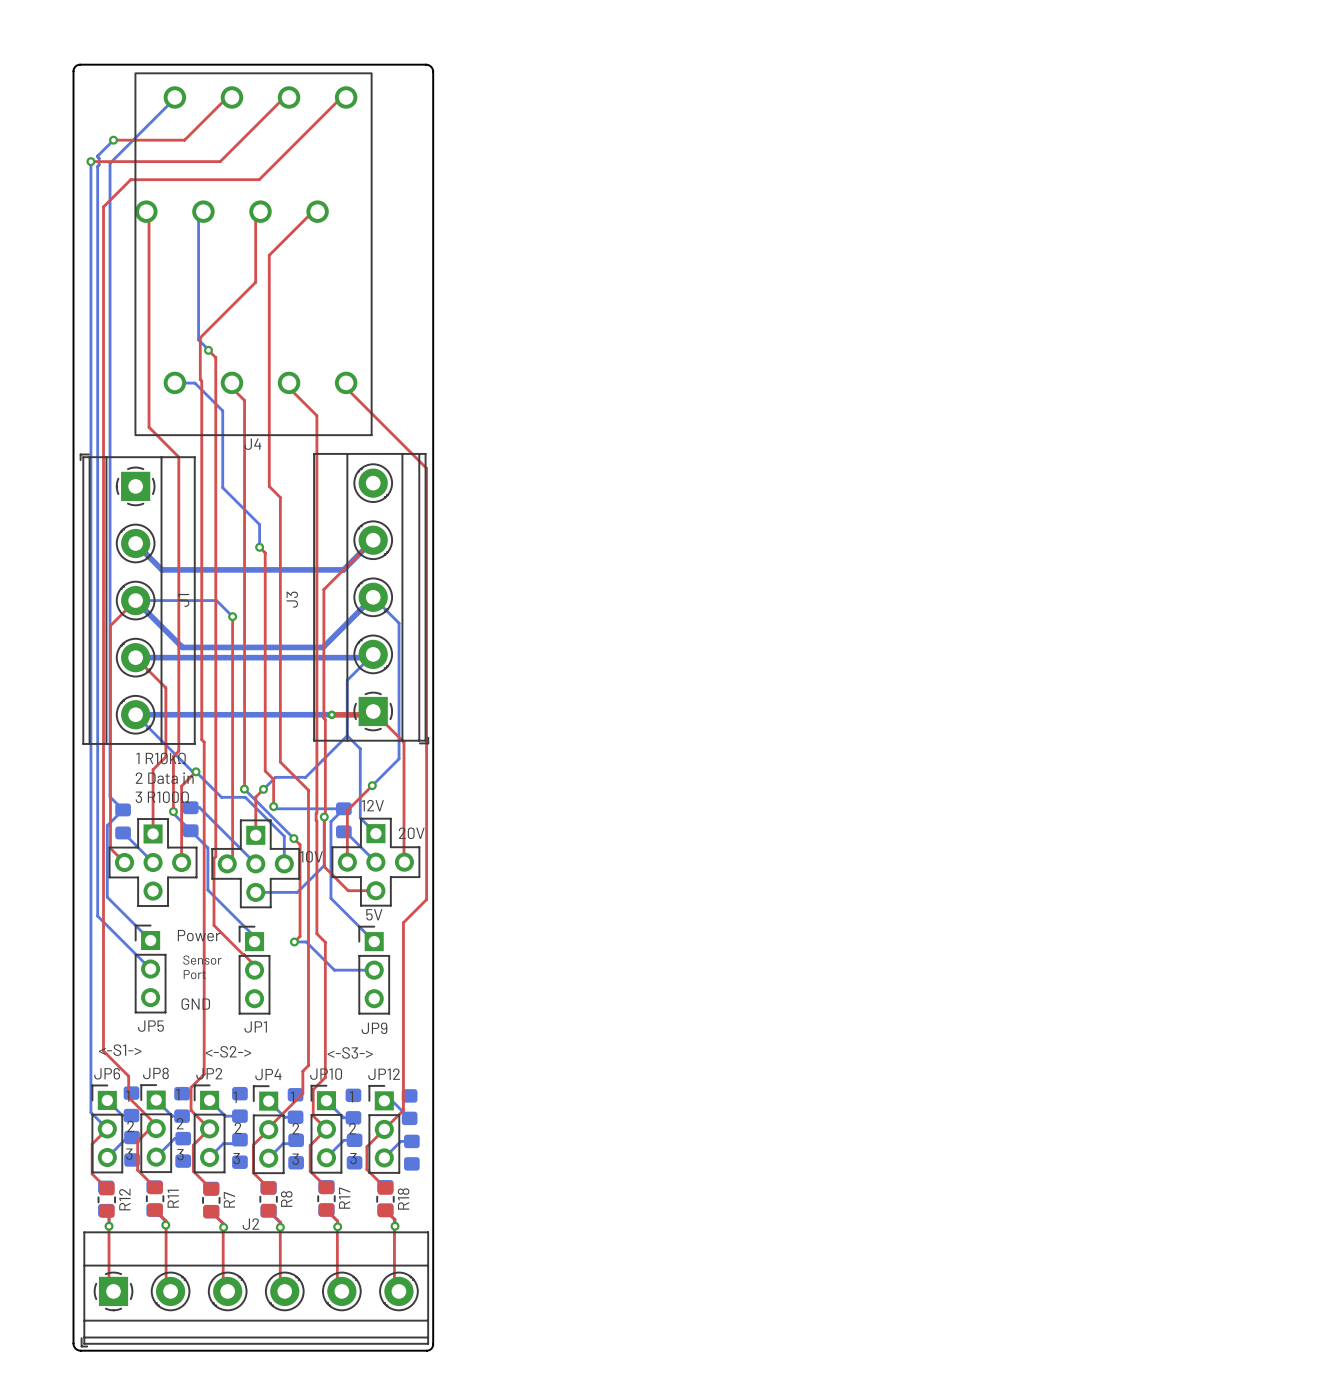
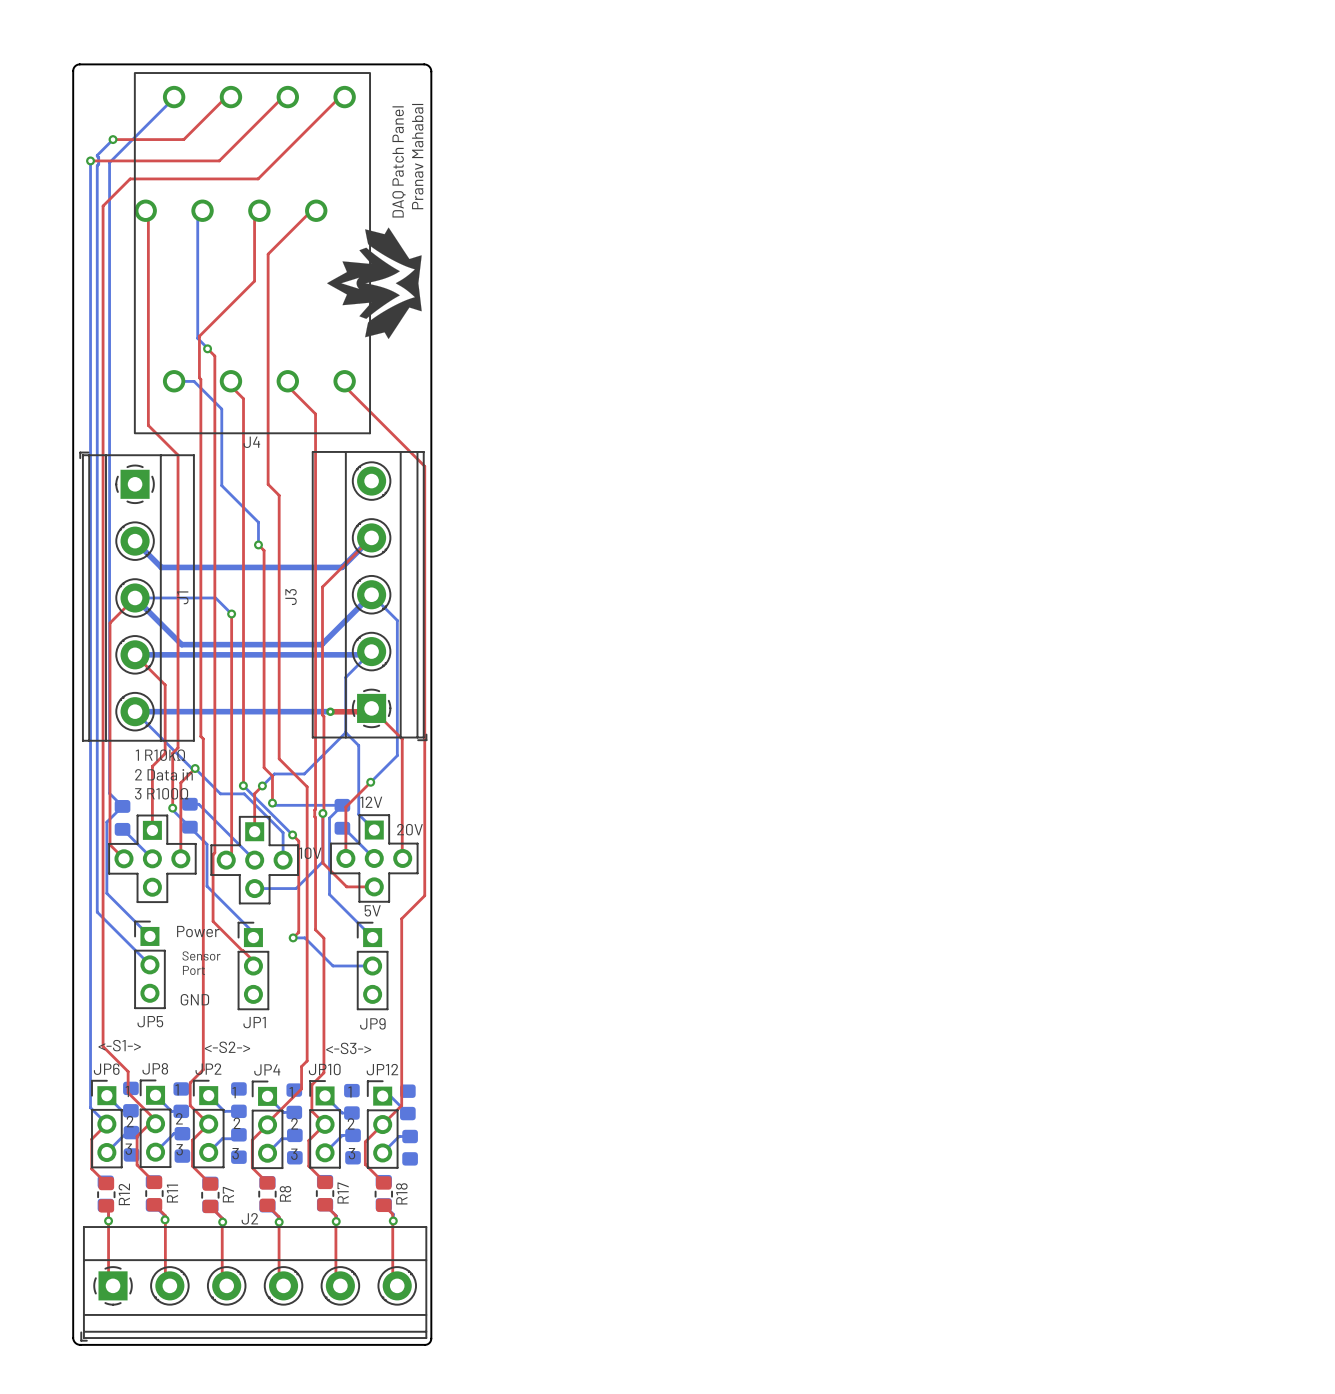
text: none -> Pranav Mahabal (417, 156)
text: none -> DAQ Patch Panel (398, 161)
drawing: none -> [327, 227, 422, 340]

